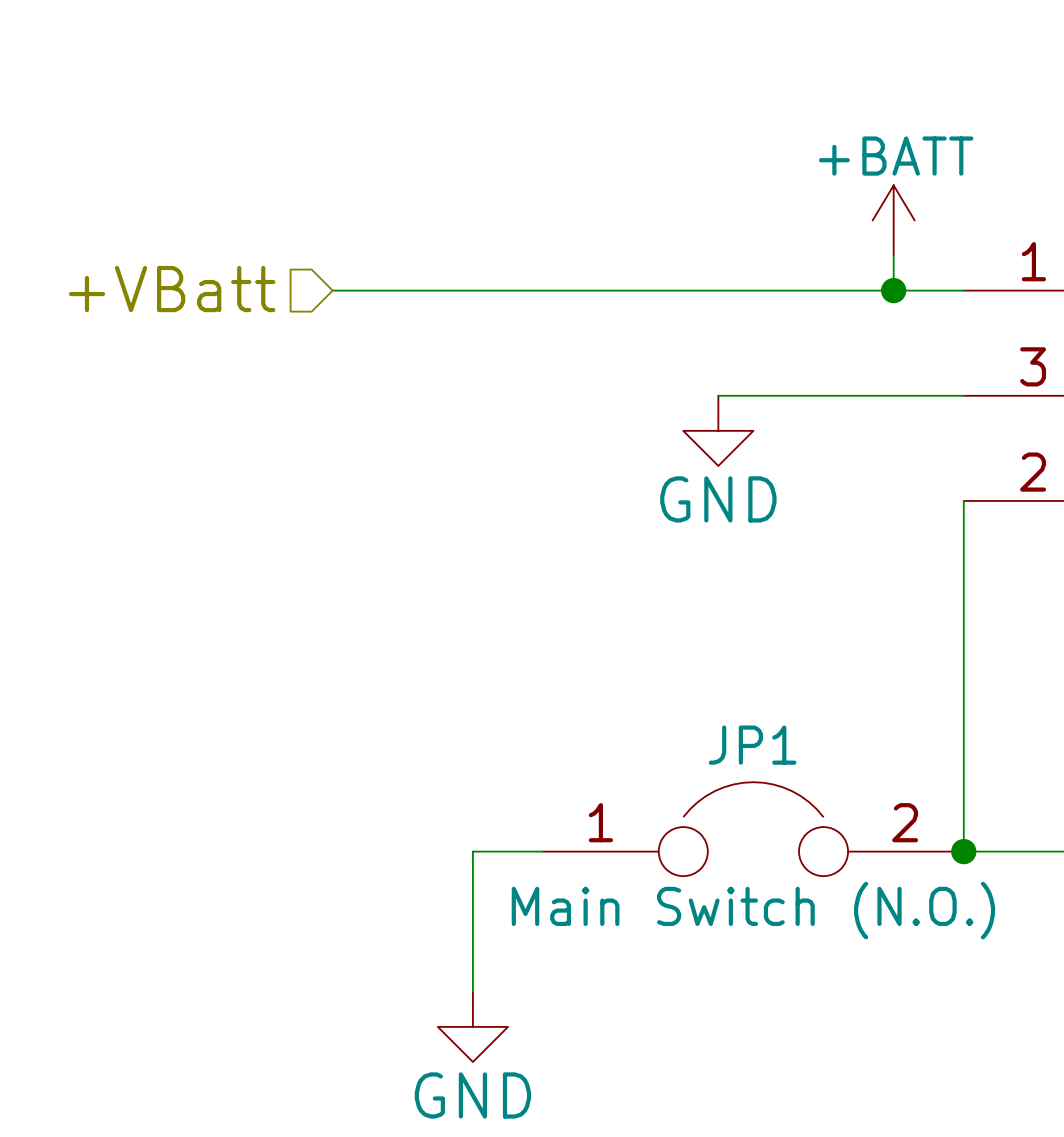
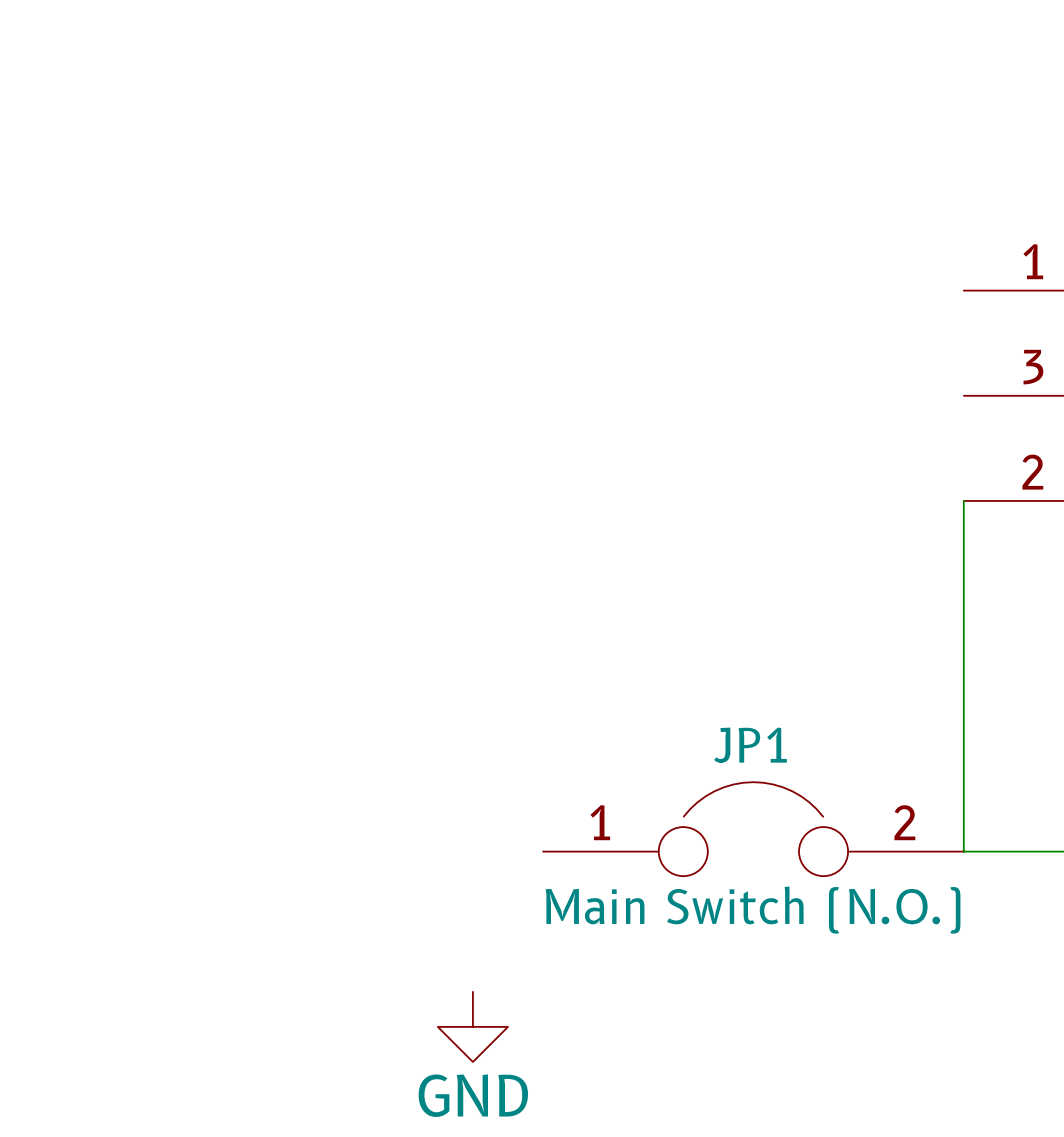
power symbol: +BATT (893, 220) -> none
wire: (893, 255) (893, 290) -> none
hierarchical label: +VBatt (172, 289) -> none
wire: (332, 290) (963, 290) -> none
junction: (893, 290) -> none
wire: (718, 395) (963, 395) -> none
power symbol: GND (718, 430) -> none
wire: (543, 851) (472, 851) (472, 991) -> none
junction: (963, 851) -> none

